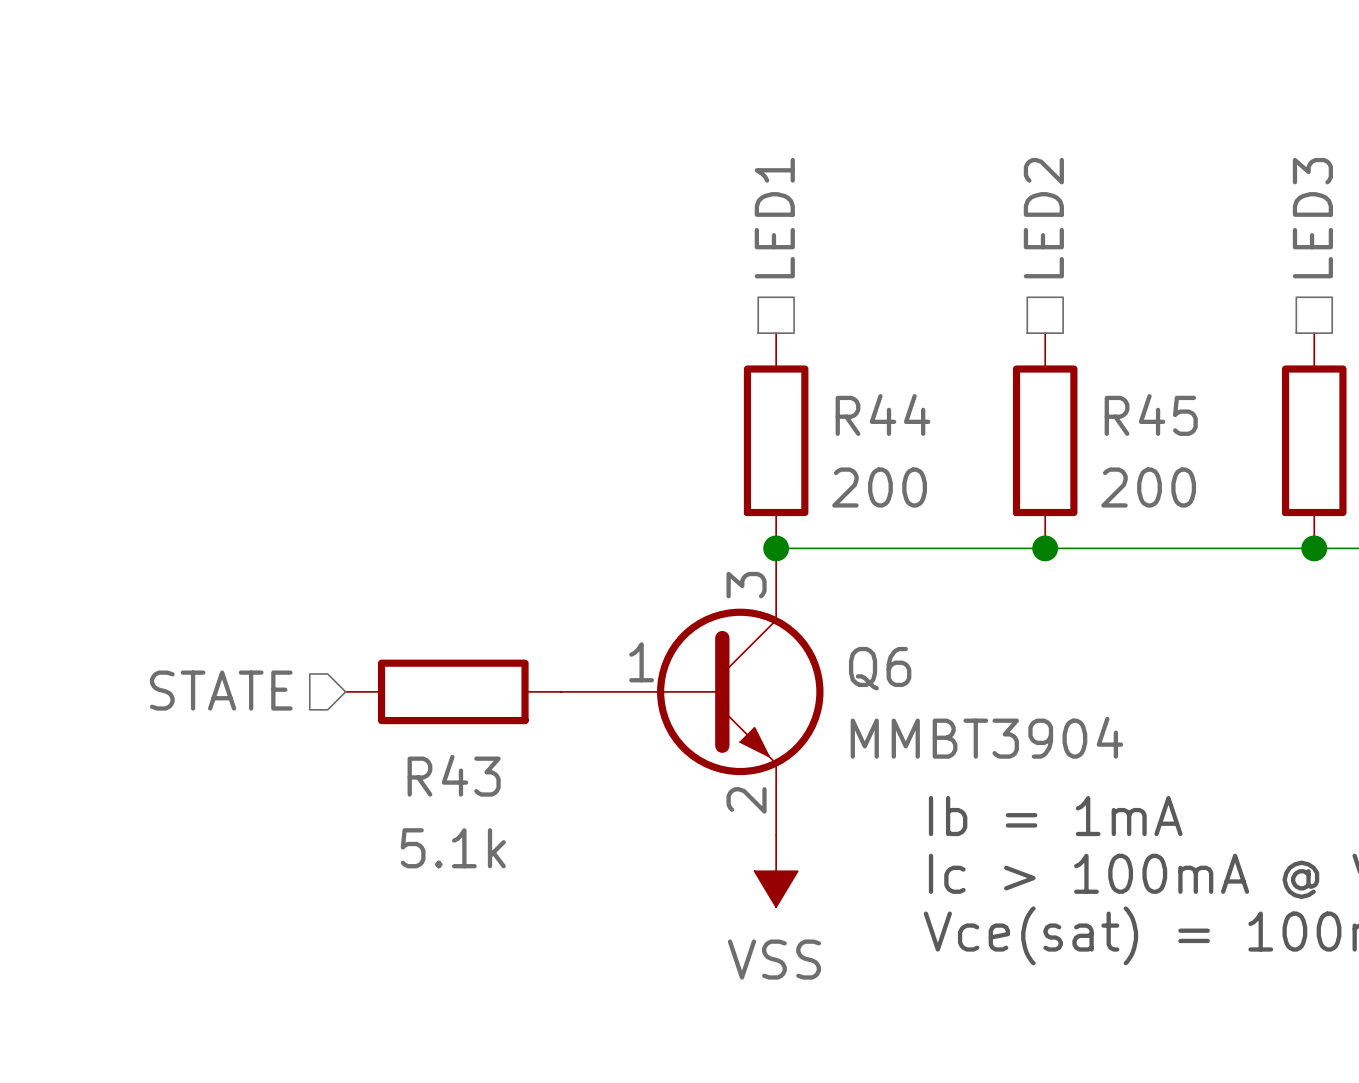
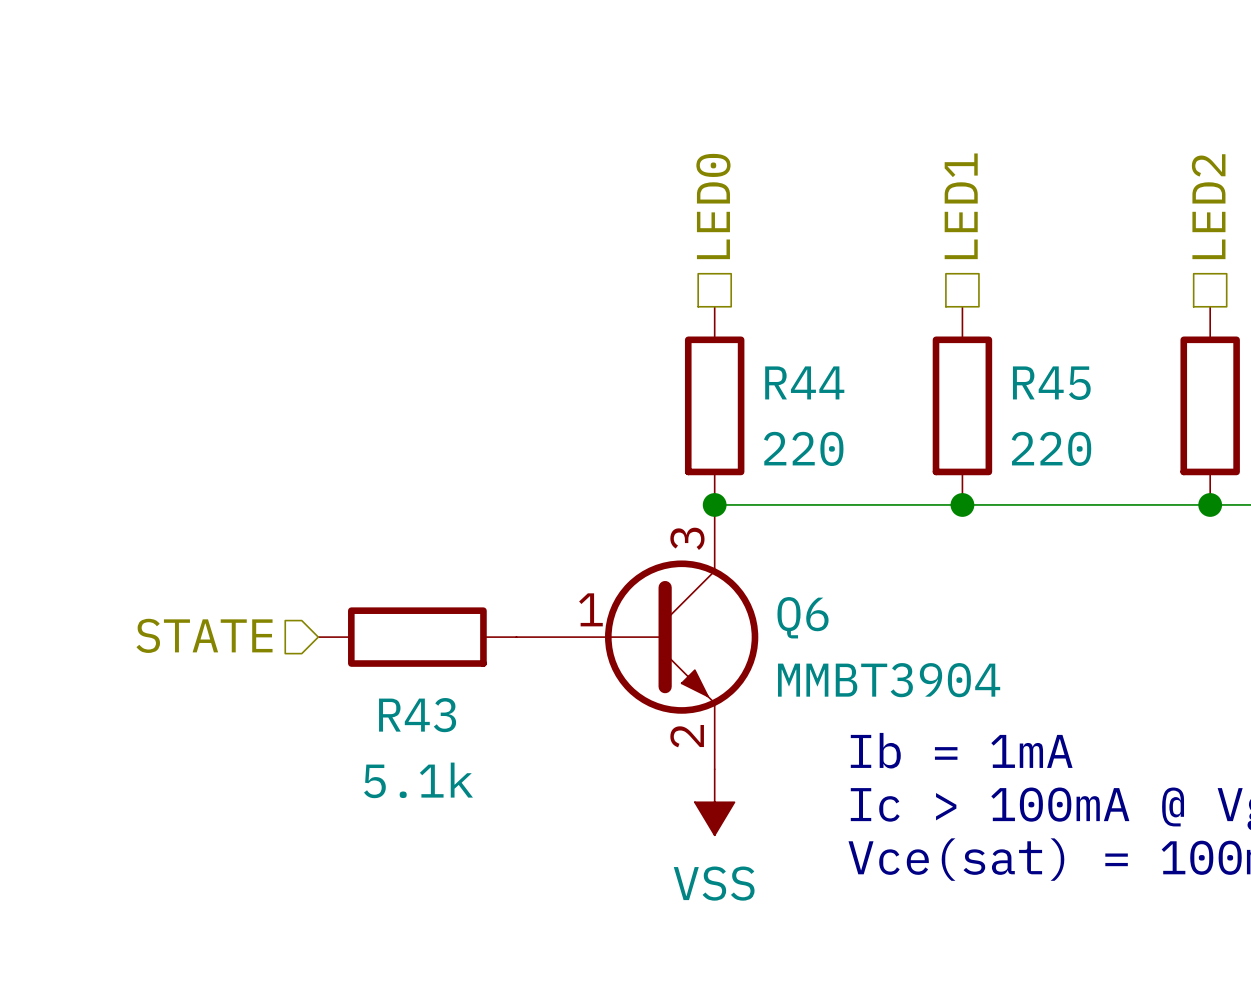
hierarchical label: LED1 (774, 218) -> LED0 (713, 206)
hierarchical label: LED2 (1043, 218) -> LED1 (961, 206)
hierarchical label: LED3 (1312, 218) -> LED2 (1208, 206)
R44 value: 200 (879, 487) -> 220 (803, 448)
R45 value: 200 (1148, 487) -> 220 (1051, 448)

